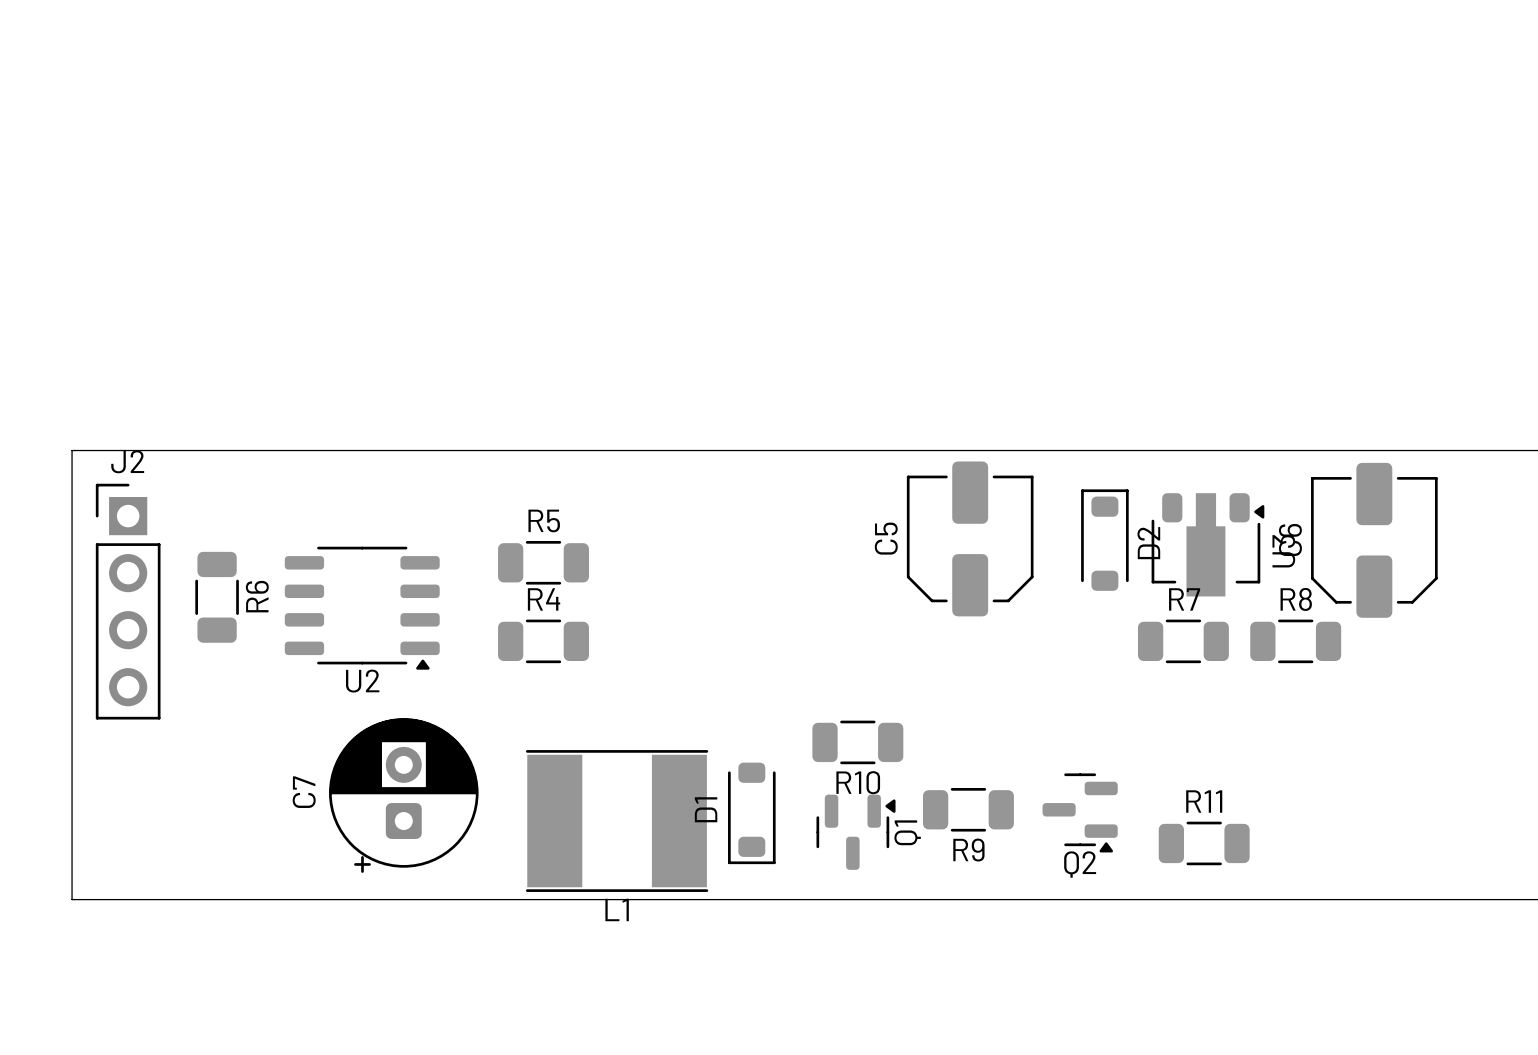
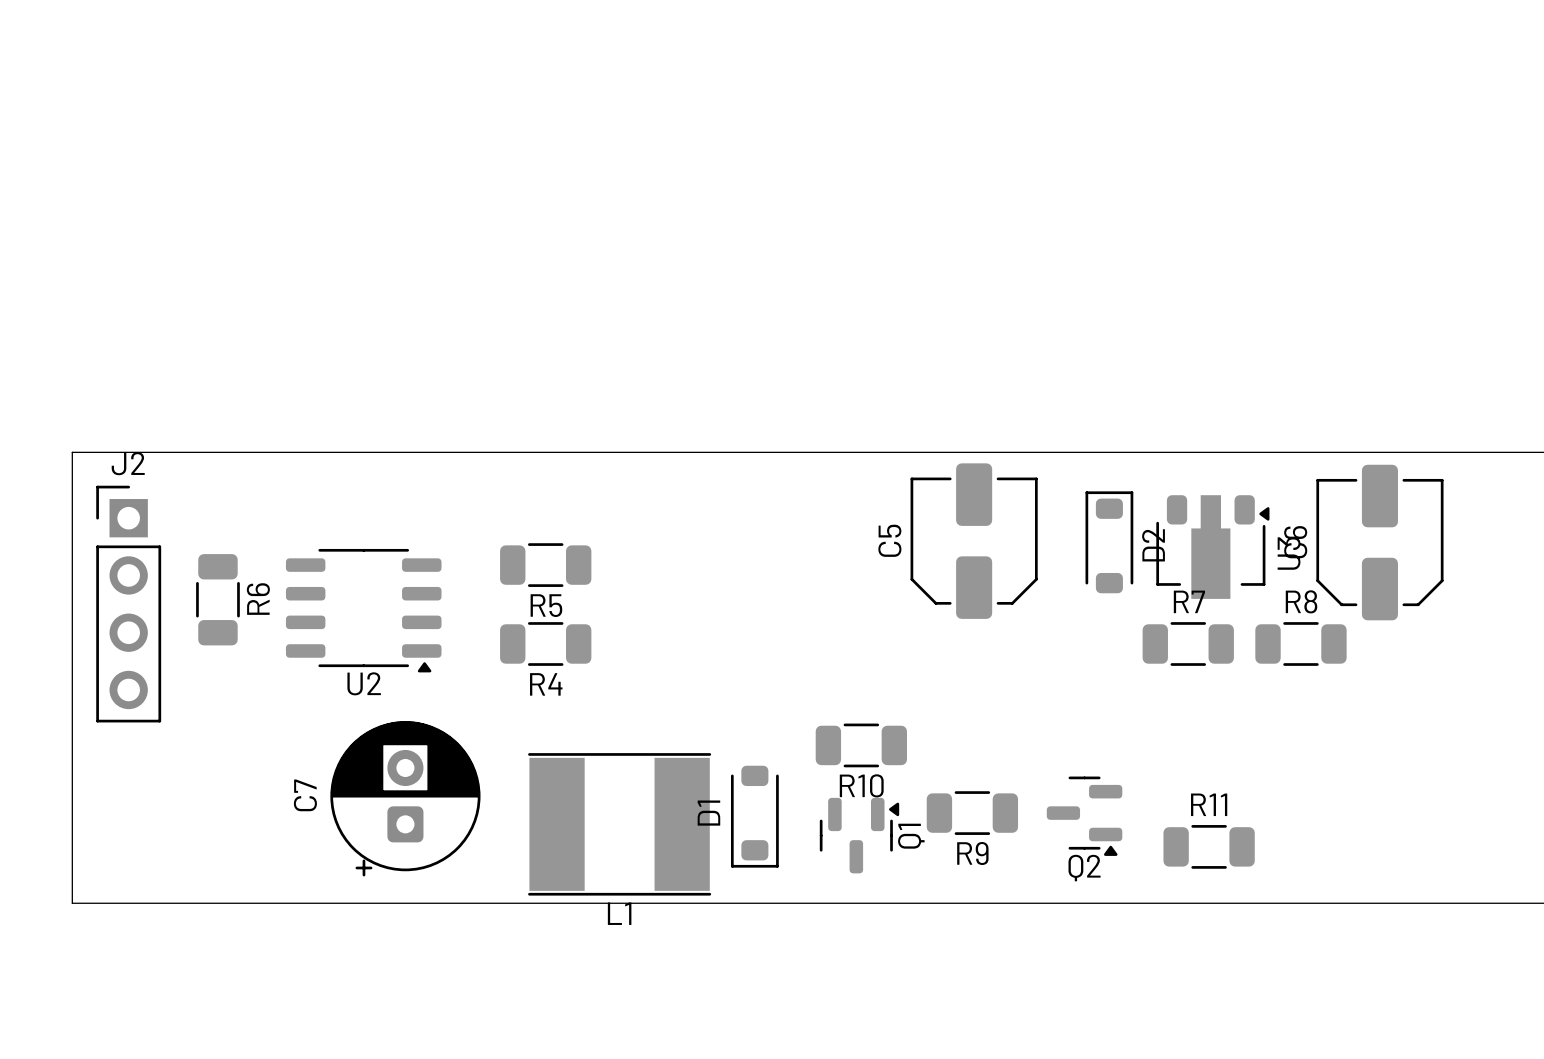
R5 name position: R5 (544, 520) -> R5 (546, 605)
R4 name position: R4 (544, 599) -> R4 (546, 684)

